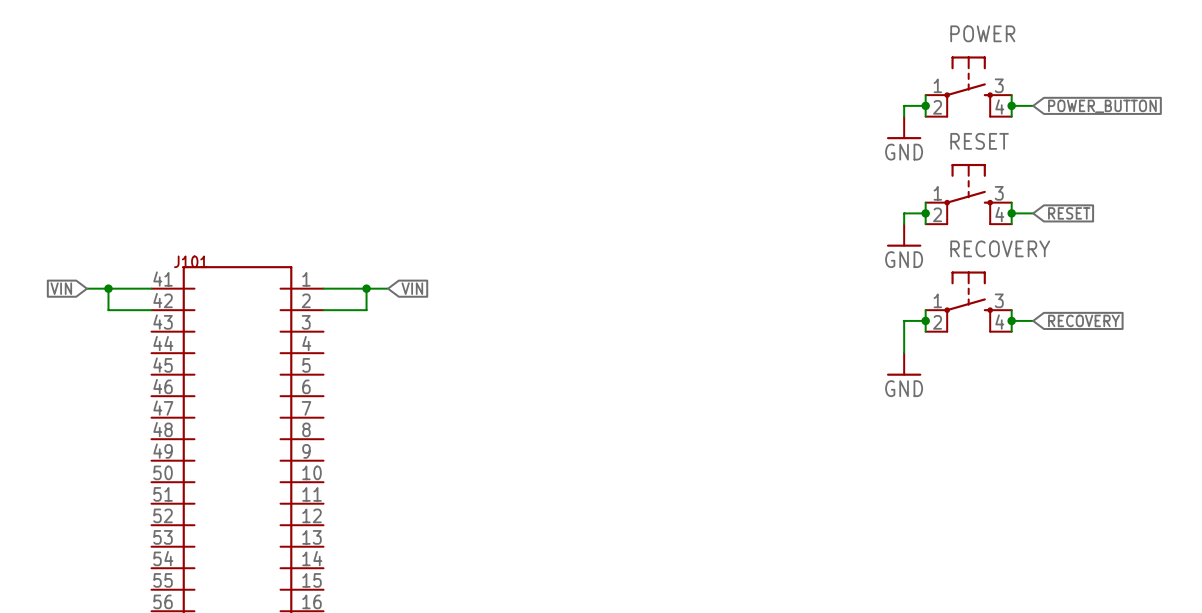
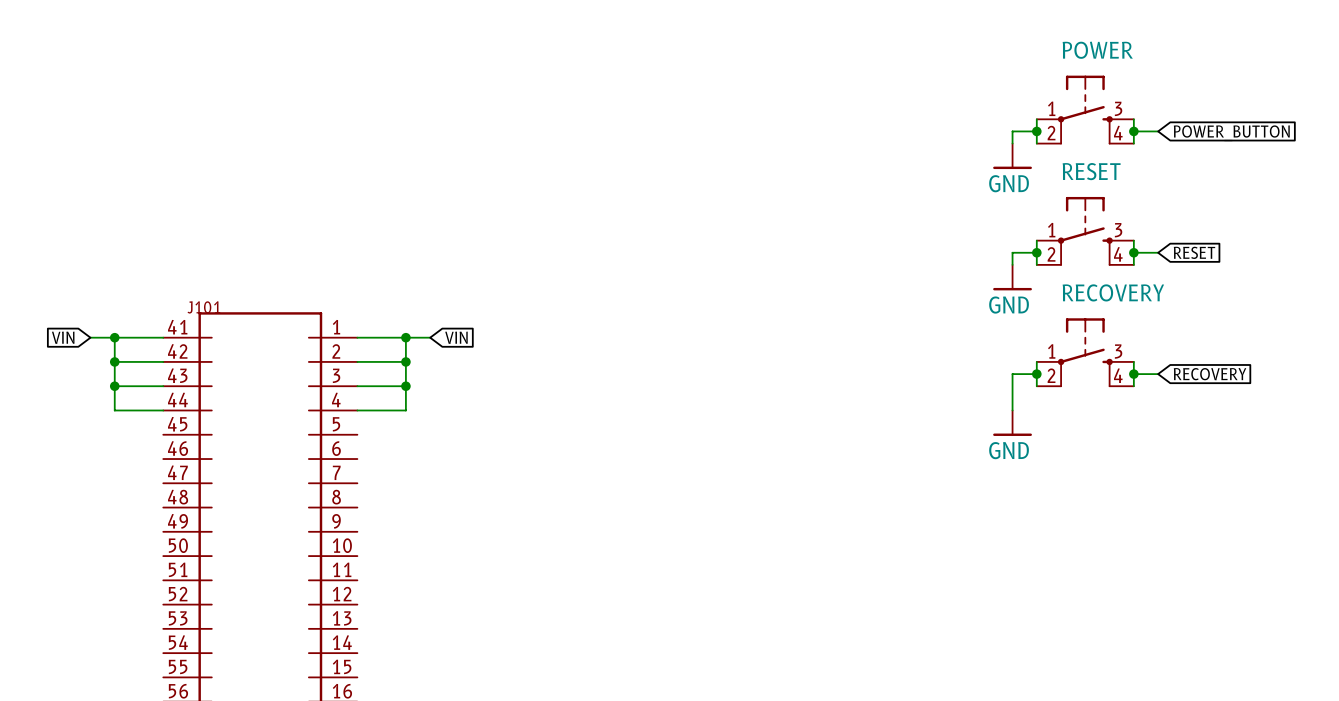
wire: none -> (114, 361) (114, 410) (163, 410)
junction: none -> (114, 361)
wire: none -> (405, 361) (405, 410) (357, 410)
junction: none -> (405, 361)
wire: none -> (114, 386) (163, 386)
junction: none -> (114, 386)
wire: none -> (357, 386) (405, 386)
junction: none -> (405, 386)

